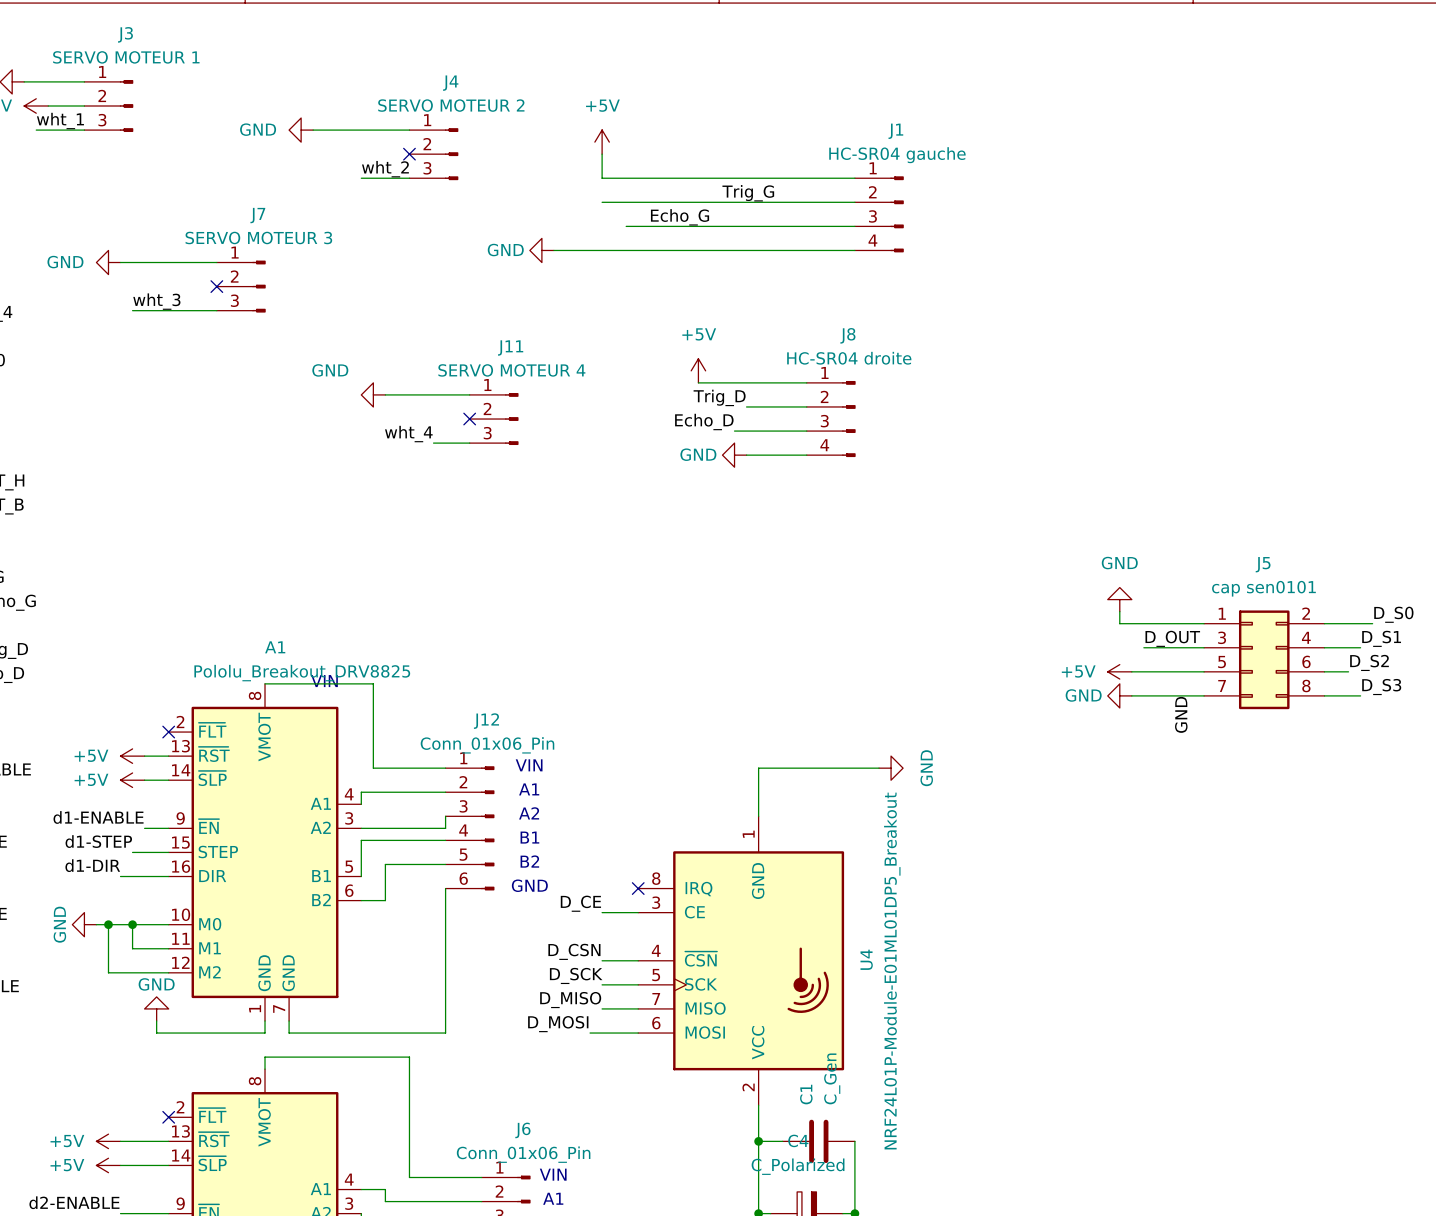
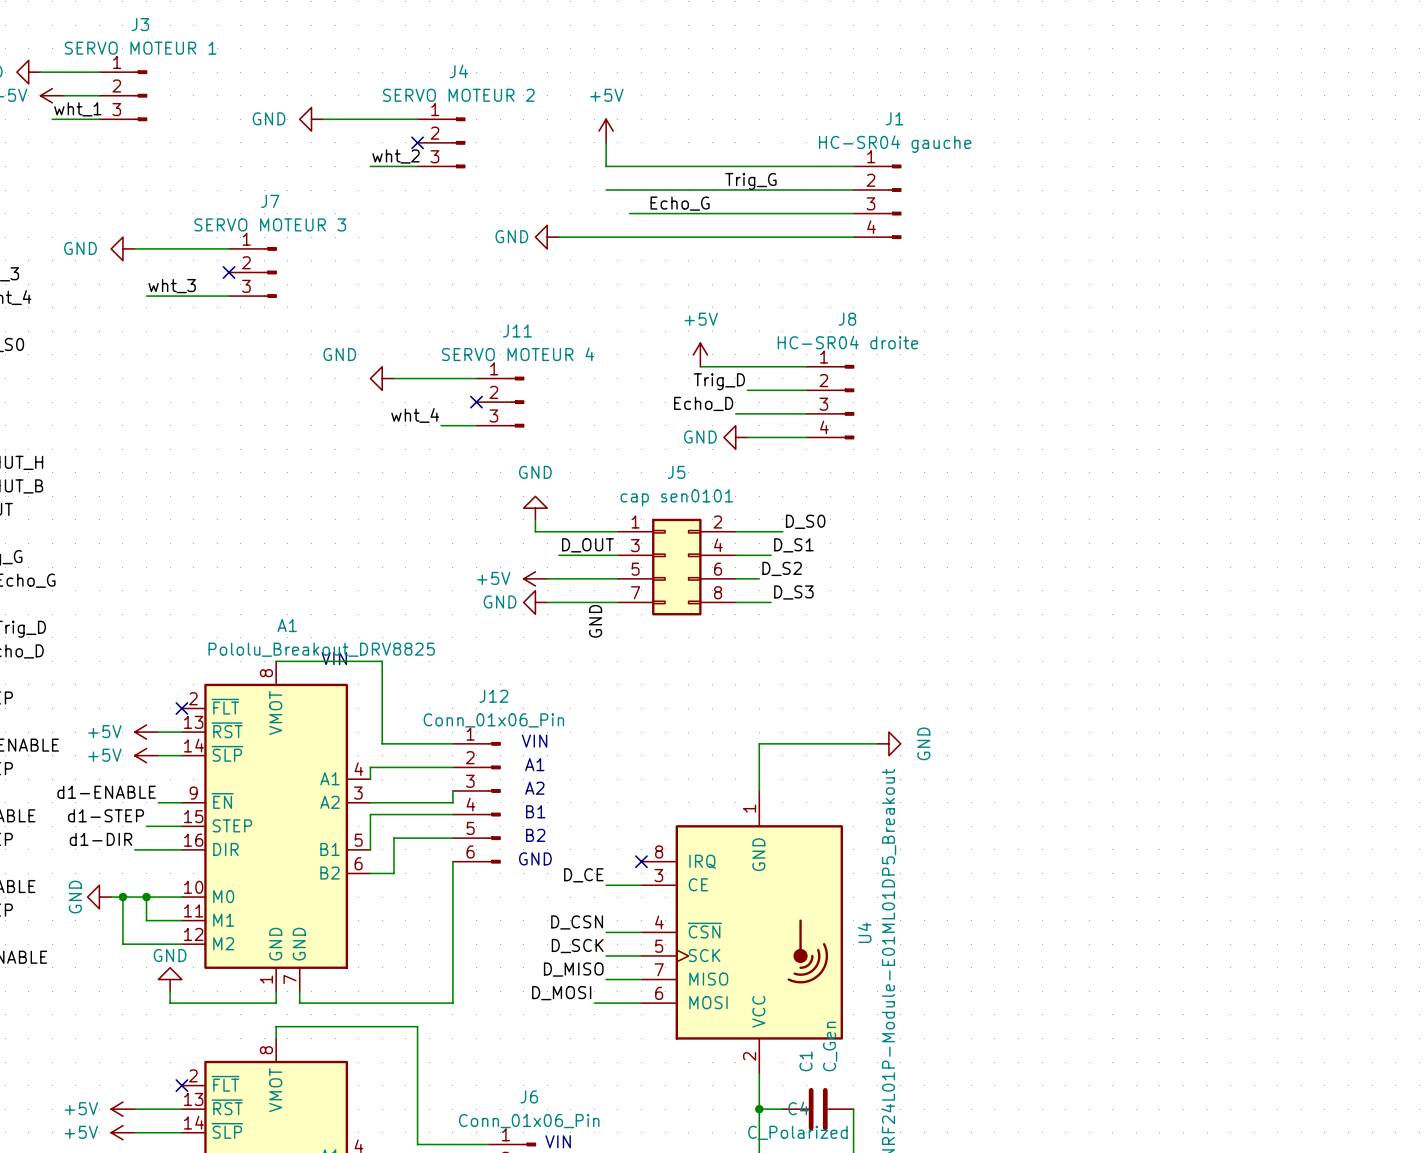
power symbol: none -> GND (535, 508)
wire: none -> (535, 519) (535, 531) (617, 531)
label: none -> D_S0 (805, 521)
wire: none -> (735, 531) (782, 531)
label: none -> D_OUT (587, 545)
label: none -> D_S1 (793, 545)
wire: none -> (558, 555) (617, 555)
wire: none -> (735, 555) (771, 555)
label: none -> D_S2 (782, 568)
power symbol: none -> +5V (535, 578)
wire: none -> (547, 578) (617, 578)
wire: none -> (735, 578) (759, 578)
power symbol: GND (1119, 599) -> none
wire: (1119, 611) (1119, 623) (1204, 623) -> none
label: none -> D_S3 (793, 592)
label: D_S0 (1393, 614) -> none
power symbol: none -> GND (535, 602)
wire: none -> (547, 602) (617, 602)
wire: none -> (735, 602) (771, 602)
wire: (1324, 623) (1372, 623) -> none
label: D_OUT (1172, 638) -> none
label: D_S1 (1381, 638) -> none
label: none -> GND (595, 621)
wire: (1143, 647) (1204, 647) -> none
wire: (1324, 647) (1360, 647) -> none
J5 position: (1264, 659) -> (676, 567)
label: D_S2 (1369, 662) -> none
power symbol: +5V (1119, 671) -> none
wire: (1131, 671) (1204, 671) -> none
wire: (1324, 671) (1348, 671) -> none
label: D_S3 (1381, 687) -> none
power symbol: GND (1119, 695) -> none
wire: (1131, 695) (1204, 695) -> none
wire: (1324, 695) (1360, 695) -> none
label: GND (1181, 714) -> none

